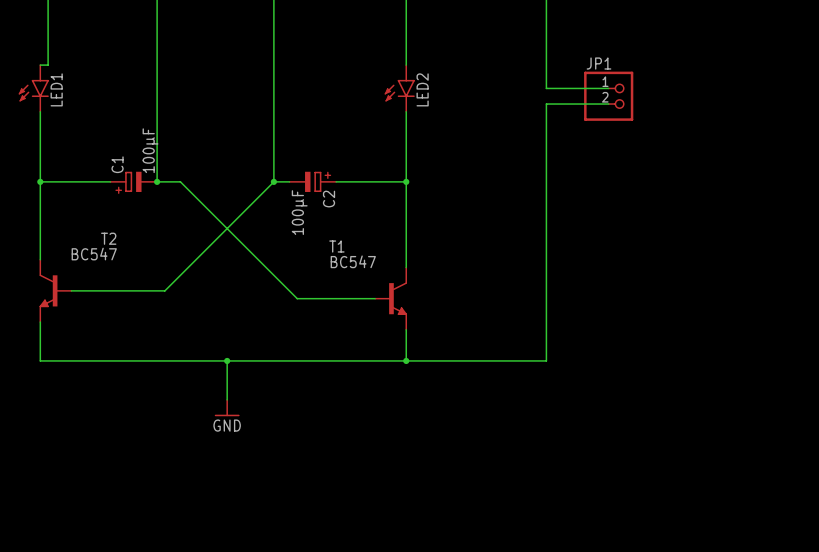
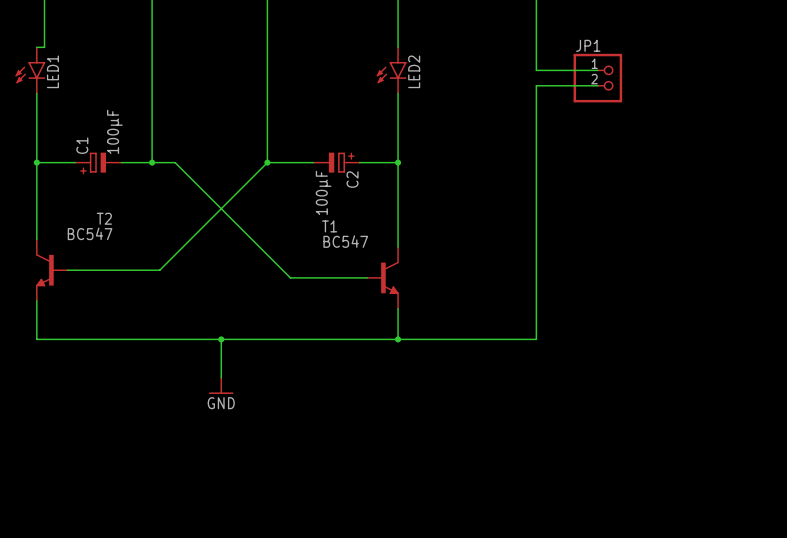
C1 position: (133, 181) -> (98, 162)
C2 position: (312, 181) -> (336, 162)

